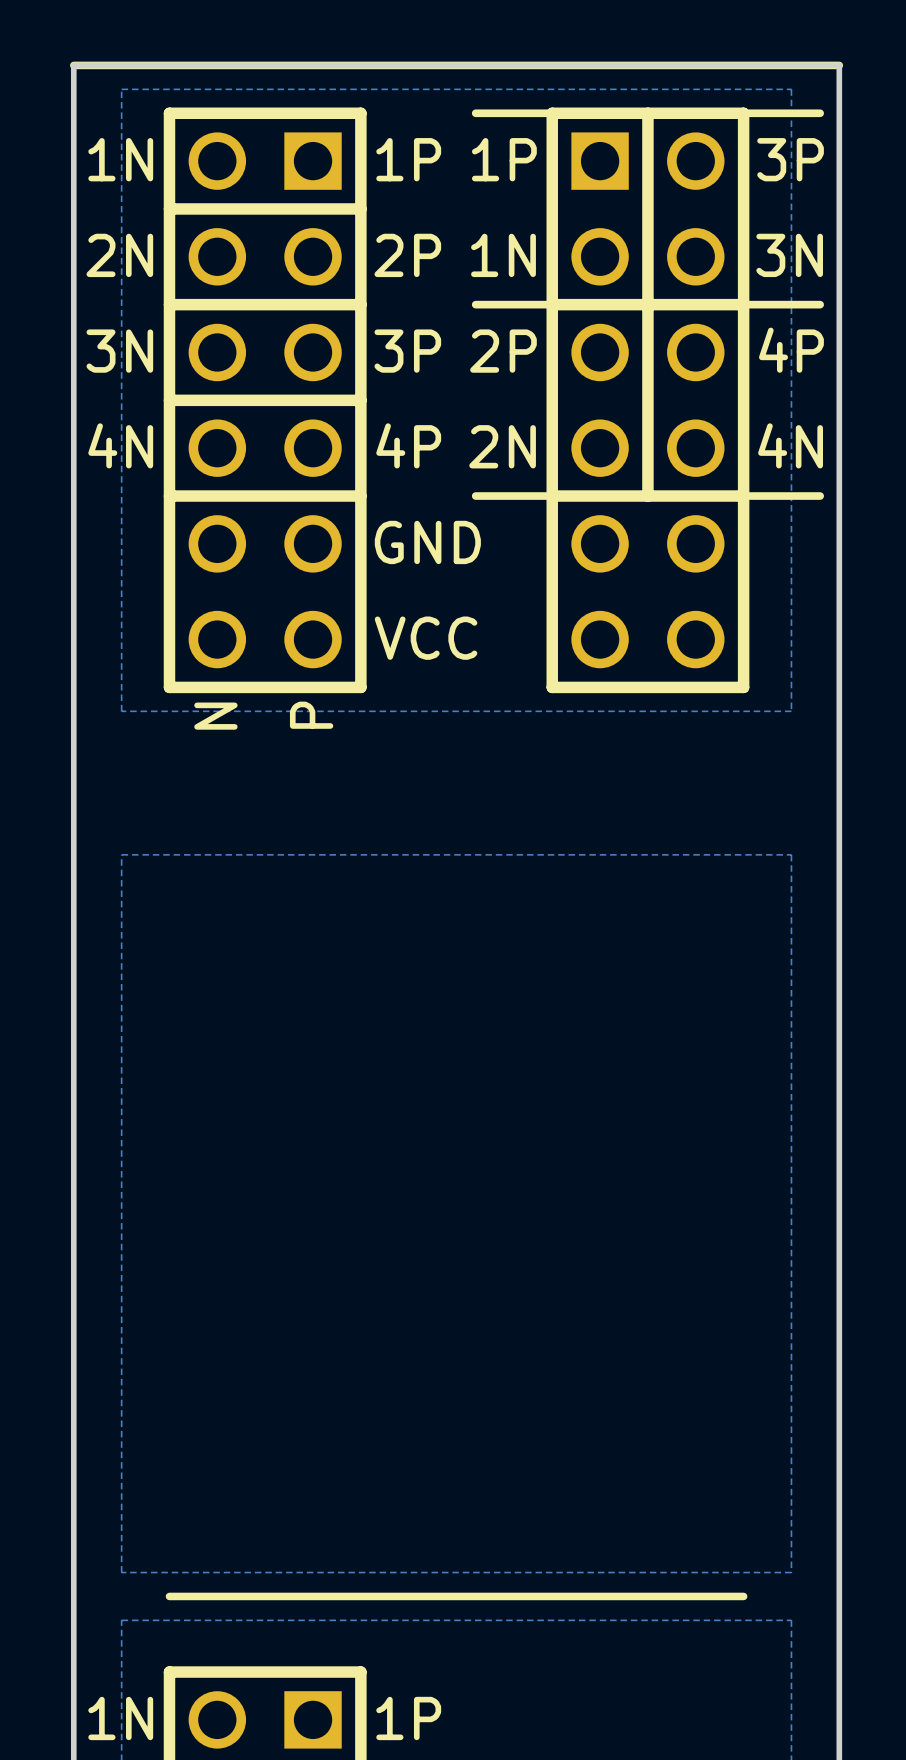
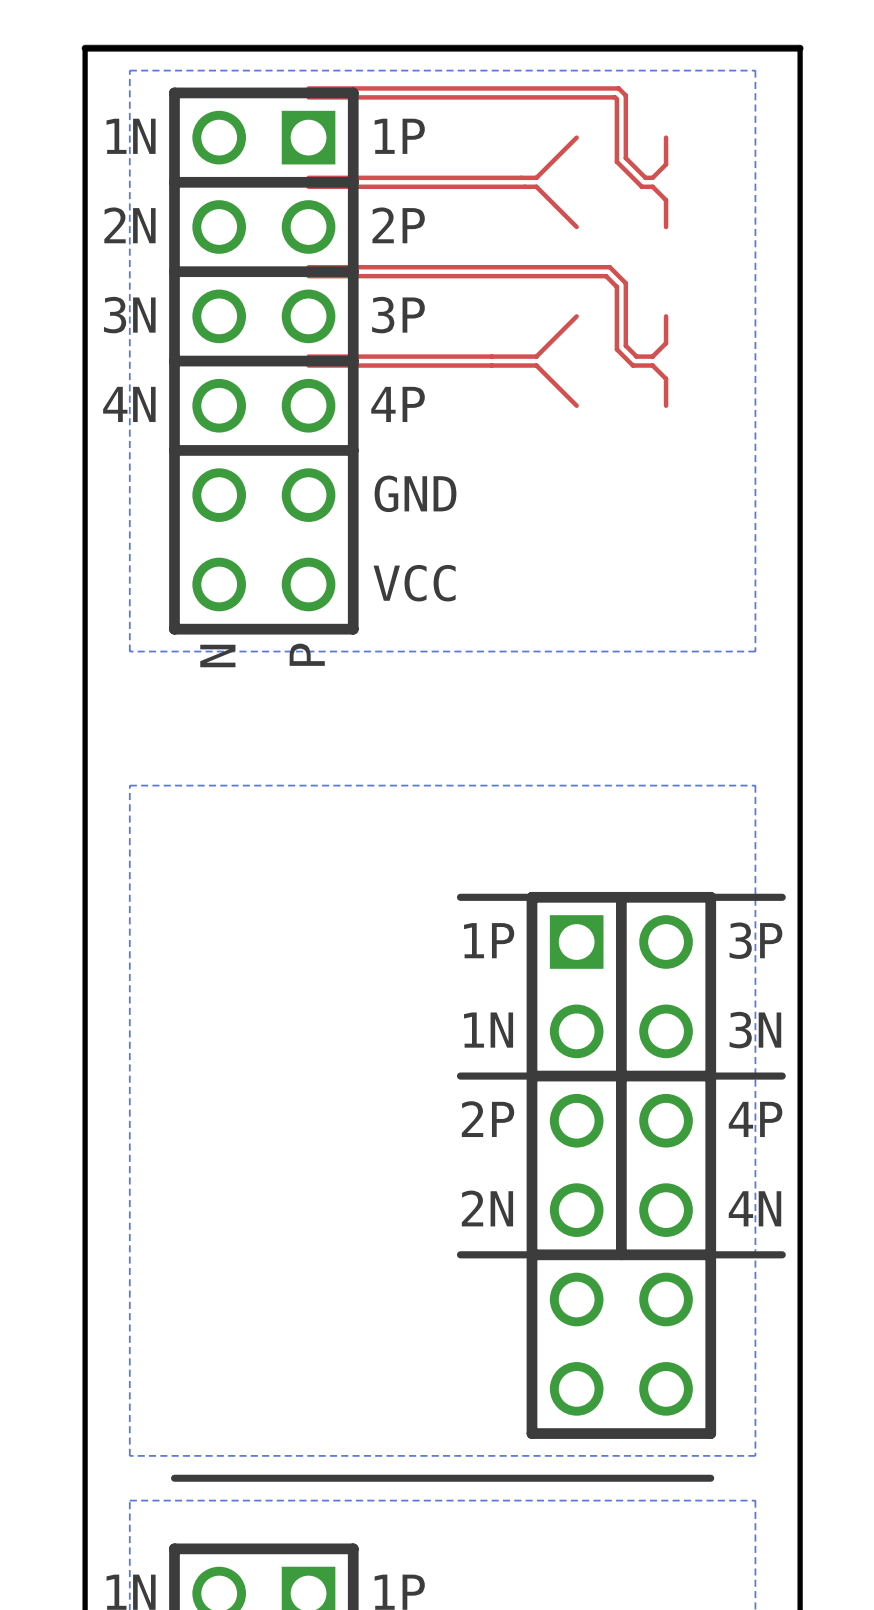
top track: none -> (308, 88) (618, 88) (625, 95) (625, 158) (645, 177) (652, 177) (666, 164) (666, 137)
top track: none -> (308, 97) (615, 97) (616, 99) (616, 161) (641, 186) (652, 186) (666, 200) (666, 227)
top track: none -> (576, 137) (536, 177) (308, 177)
top track: none -> (308, 186) (536, 186) (576, 227)
top track: none -> (308, 267) (609, 267) (625, 283) (625, 345) (636, 356) (652, 356) (666, 343) (666, 316)
top track: none -> (308, 276) (606, 276) (616, 286) (616, 349) (632, 365) (652, 365) (666, 378) (666, 405)
top track: none -> (576, 316) (536, 356) (308, 356)
part position: (647, 400) -> (621, 1165)
top track: none -> (308, 365) (536, 365) (576, 405)

